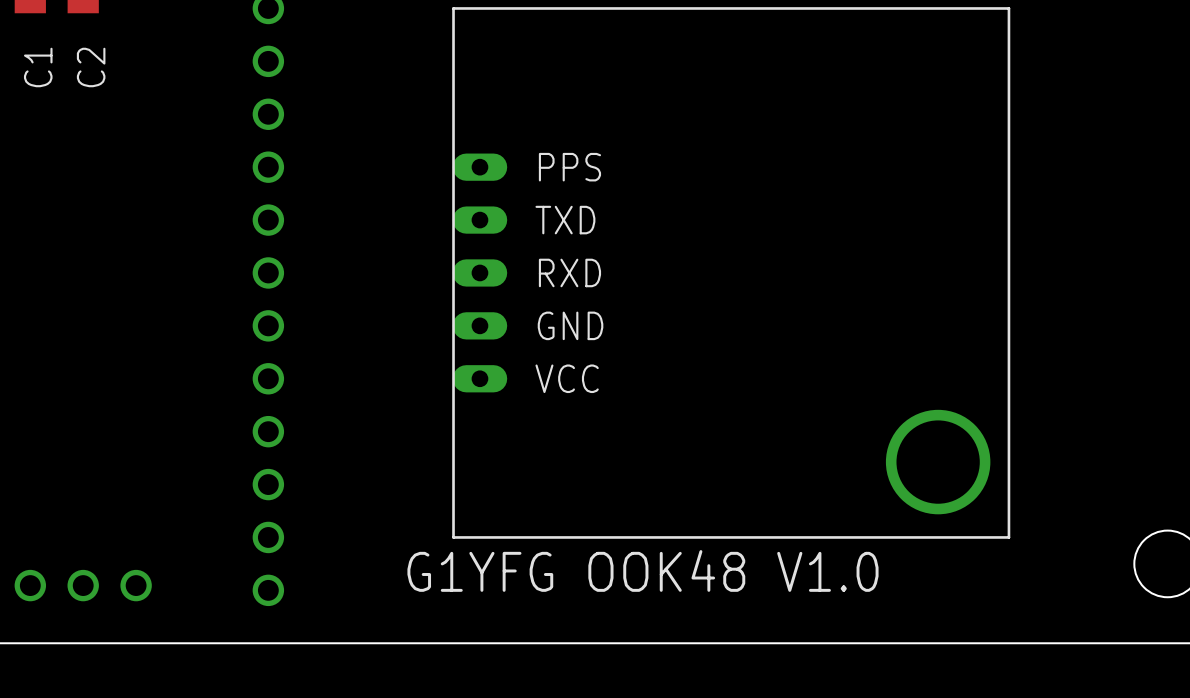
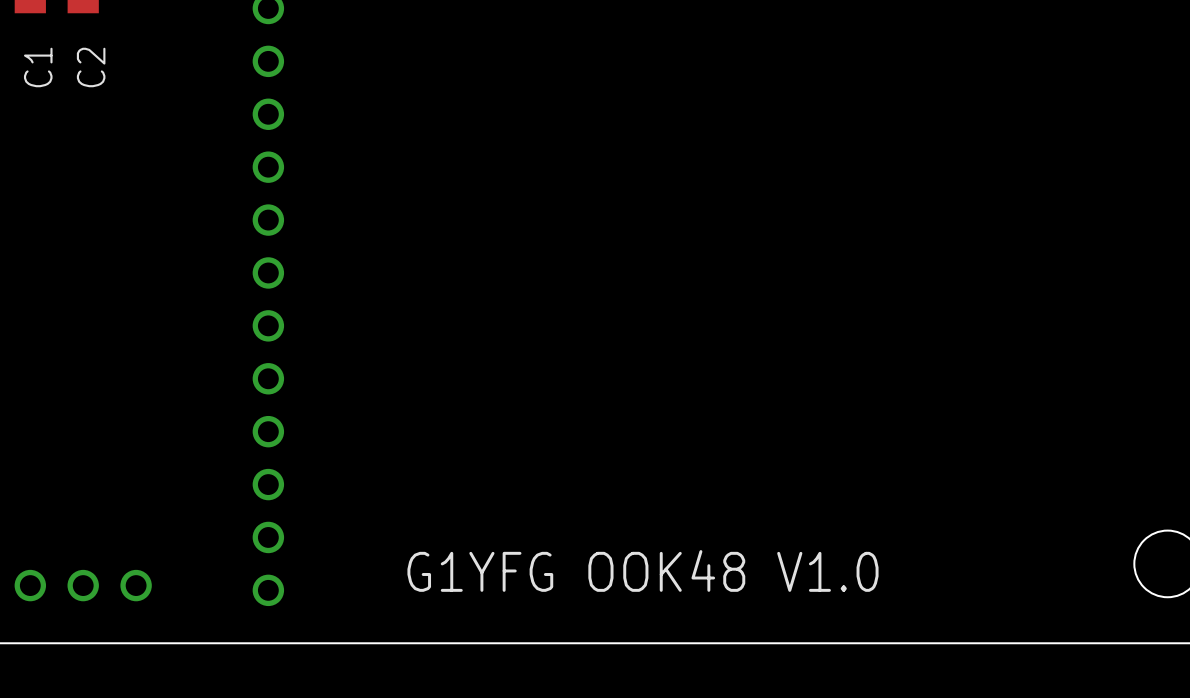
part: (731, 272) -> none

